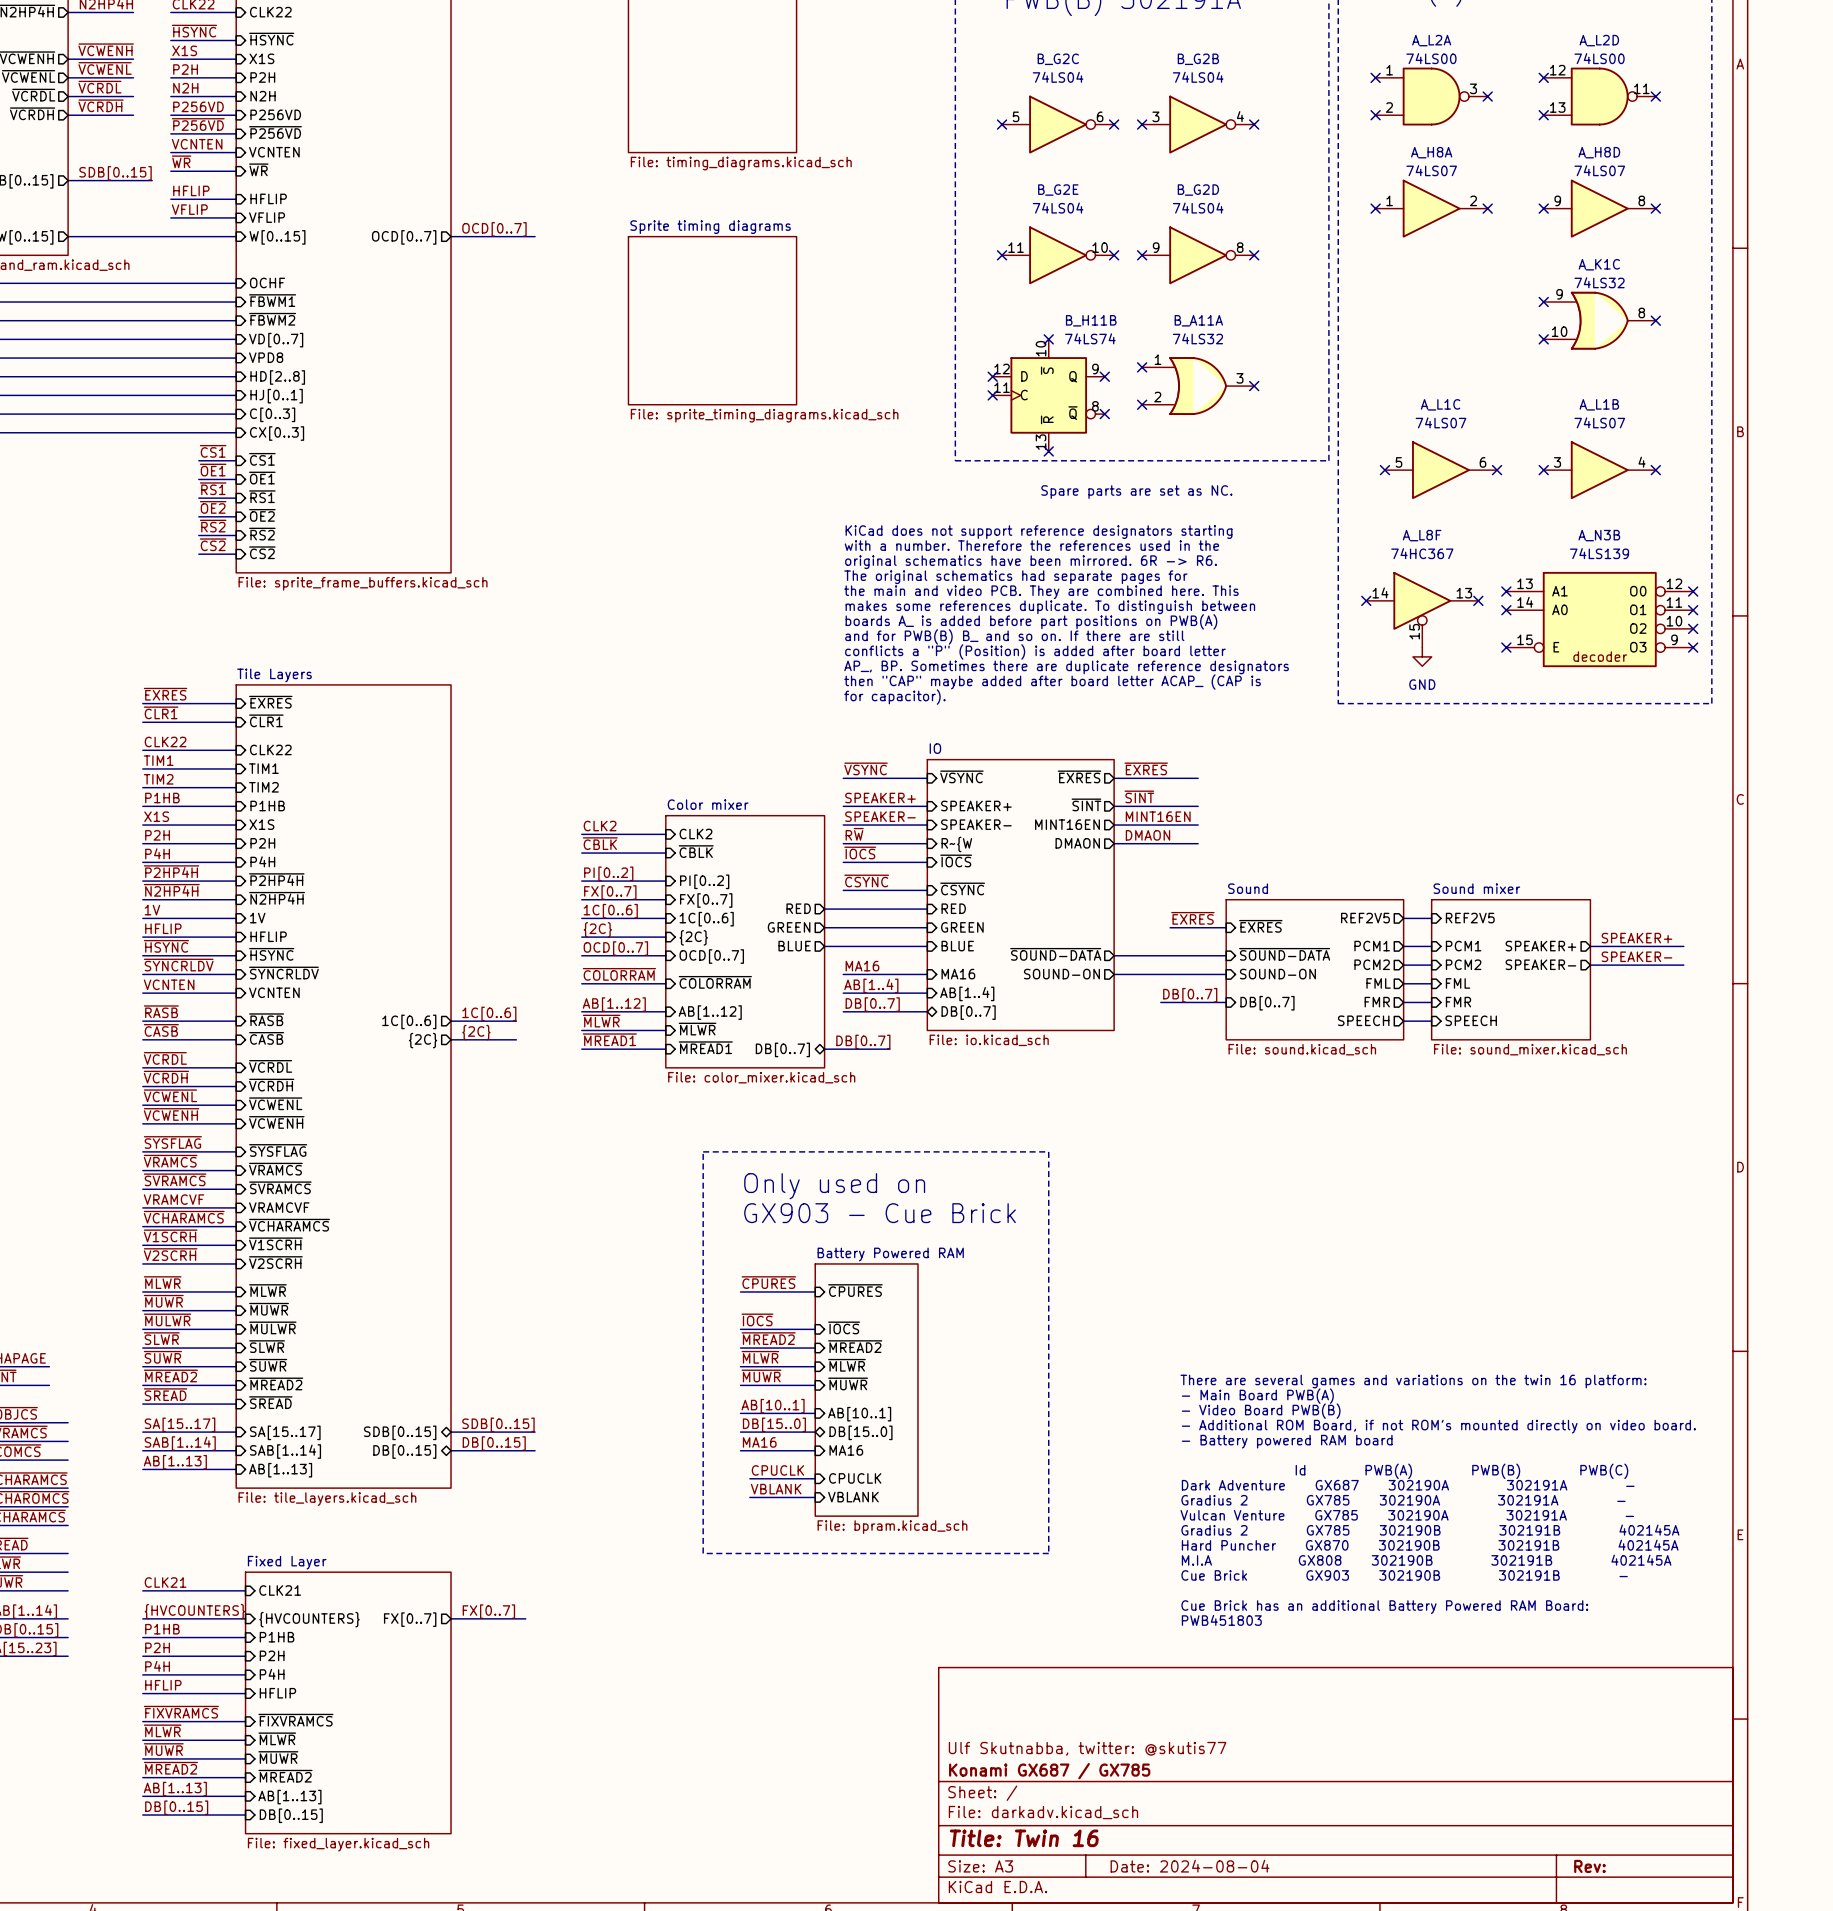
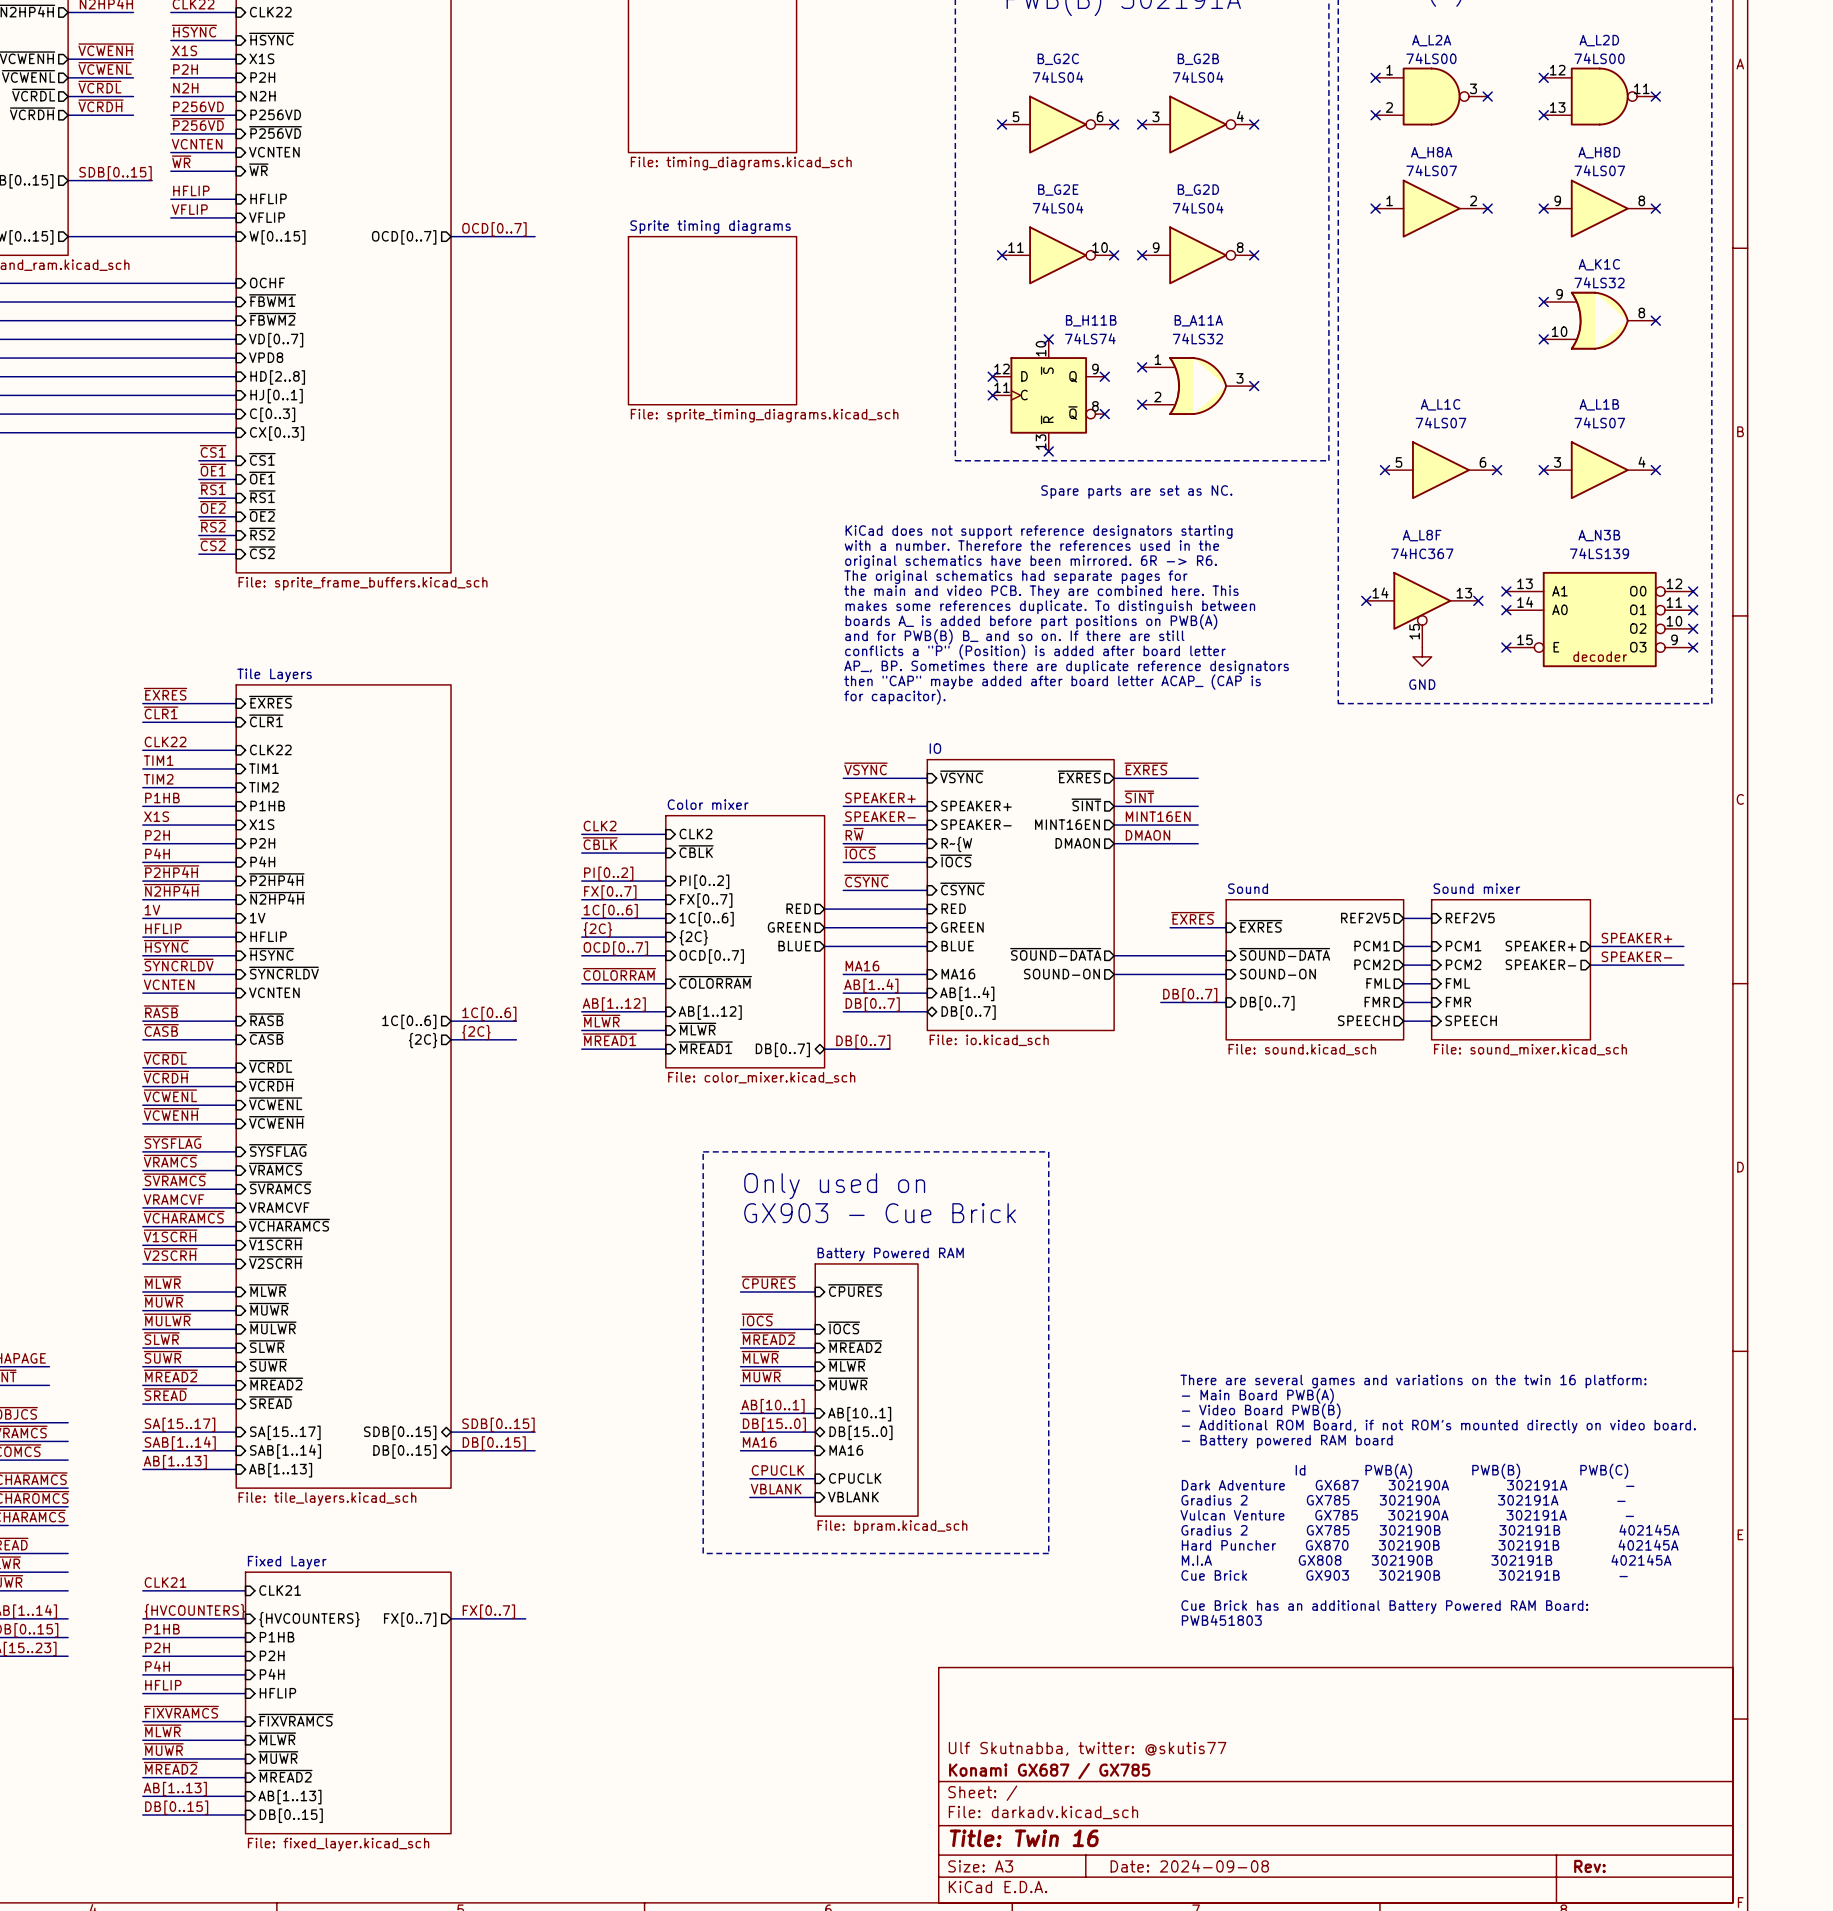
title block: Date: 2024-08-04 (1190, 1866) -> Date: 2024-09-08 (1189, 1866)

